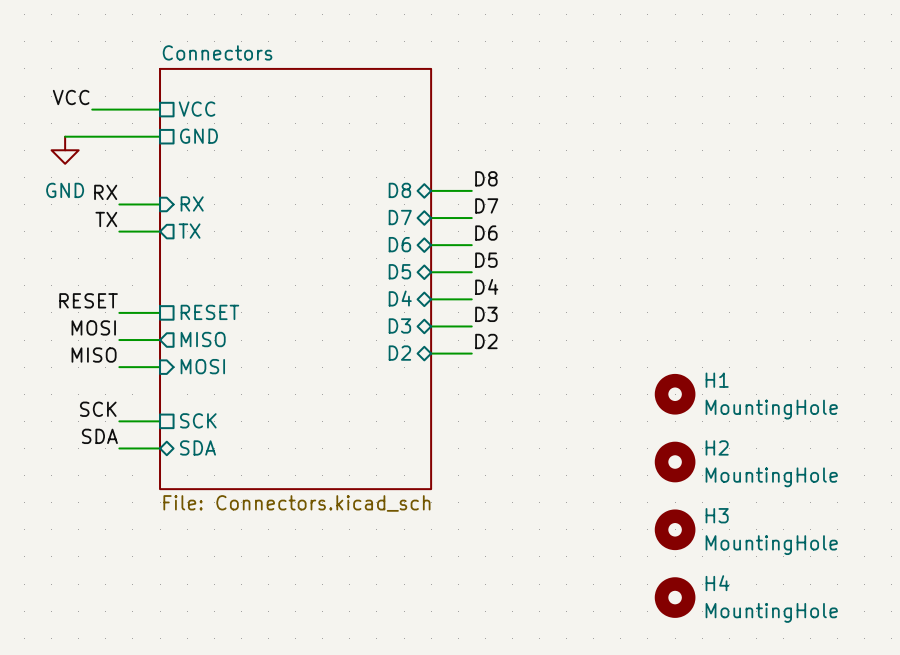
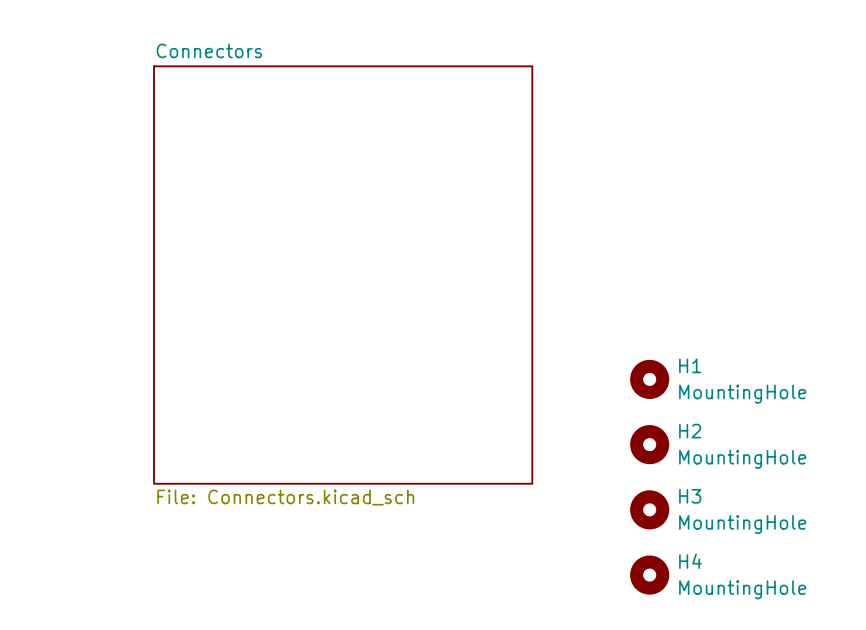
label: VCC (71, 97) -> none
wire: (92, 109) (160, 109) -> none
sheet pin: VCC (197, 109) -> none
wire: (65, 136) (160, 136) -> none
sheet pin: GND (198, 136) -> none
power symbol: GND (65, 150) -> none
label: D8 (486, 178) -> none
sheet pin: D8 (399, 190) -> none
wire: (431, 190) (471, 190) -> none
label: RX (105, 192) -> none
sheet pin: RX (192, 203) -> none
wire: (119, 204) (160, 204) -> none
label: D7 (486, 205) -> none
sheet pin: D7 (400, 217) -> none
wire: (431, 218) (471, 218) -> none
label: TX (106, 219) -> none
wire: (119, 231) (160, 231) -> none
sheet pin: TX (189, 231) -> none
label: D6 (486, 233) -> none
sheet pin: D6 (399, 244) -> none
wire: (431, 245) (471, 245) -> none
label: D5 (486, 260) -> none
sheet pin: D5 (399, 271) -> none
wire: (431, 272) (471, 272) -> none
sheet Connectors: File: Connectors.kicad_sch (295, 279) -> none
sheet Connectors: none -> File: Connectors.kicad_sch (343, 275)
label: D4 (486, 286) -> none
sheet pin: D4 (400, 298) -> none
wire: (431, 299) (471, 299) -> none
label: RESET (88, 300) -> none
wire: (119, 312) (160, 312) -> none
sheet pin: RESET (209, 312) -> none
label: D3 (486, 314) -> none
sheet pin: D3 (399, 325) -> none
wire: (431, 326) (471, 326) -> none
label: MOSI (93, 327) -> none
sheet pin: MISO (203, 339) -> none
wire: (119, 340) (160, 340) -> none
label: D2 (486, 341) -> none
sheet pin: D2 (399, 353) -> none
wire: (431, 353) (471, 353) -> none
label: MISO (94, 355) -> none
sheet pin: MOSI (202, 366) -> none
wire: (119, 367) (160, 367) -> none
label: SCK (98, 409) -> none
sheet pin: SCK (198, 420) -> none
wire: (119, 421) (160, 421) -> none
label: SDA (99, 436) -> none
sheet pin: SDA (197, 447) -> none
wire: (119, 448) (160, 448) -> none

